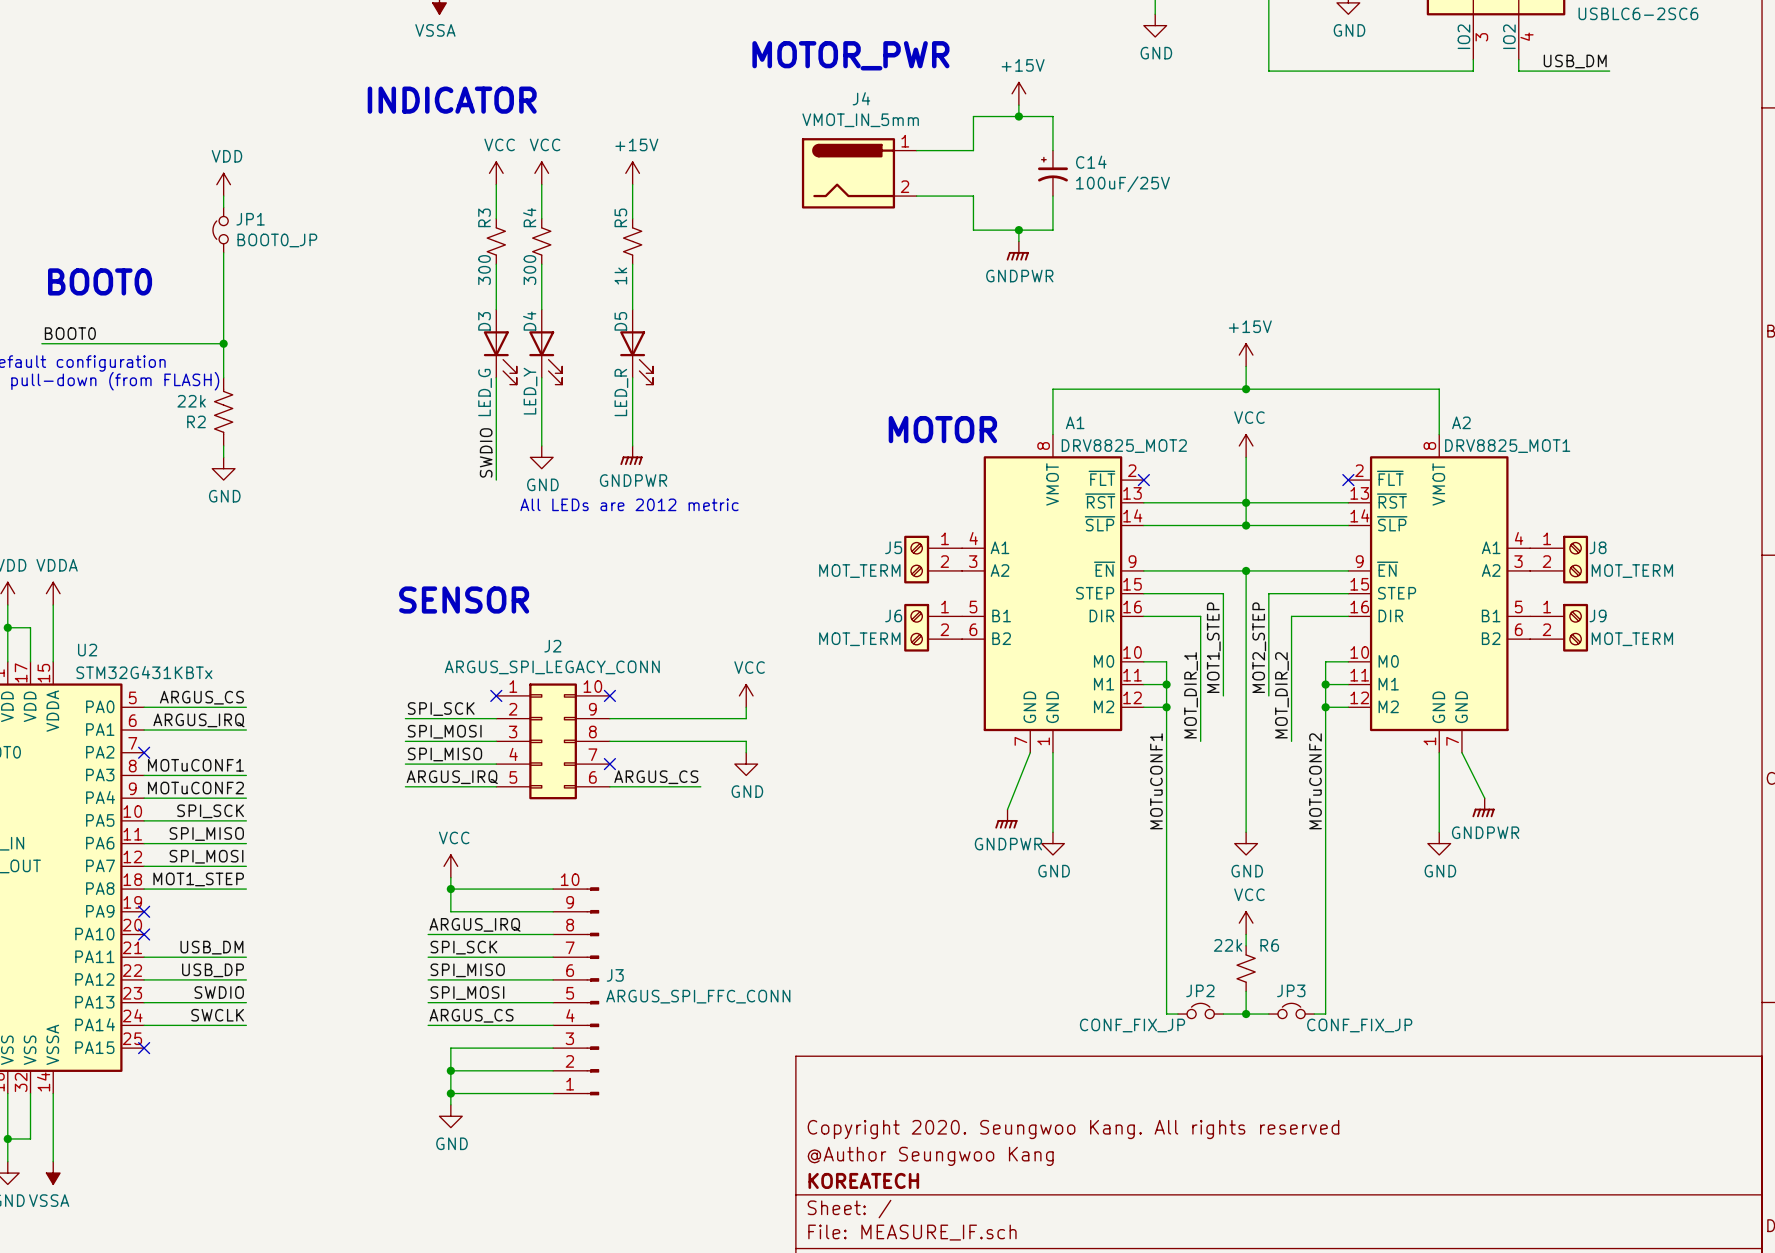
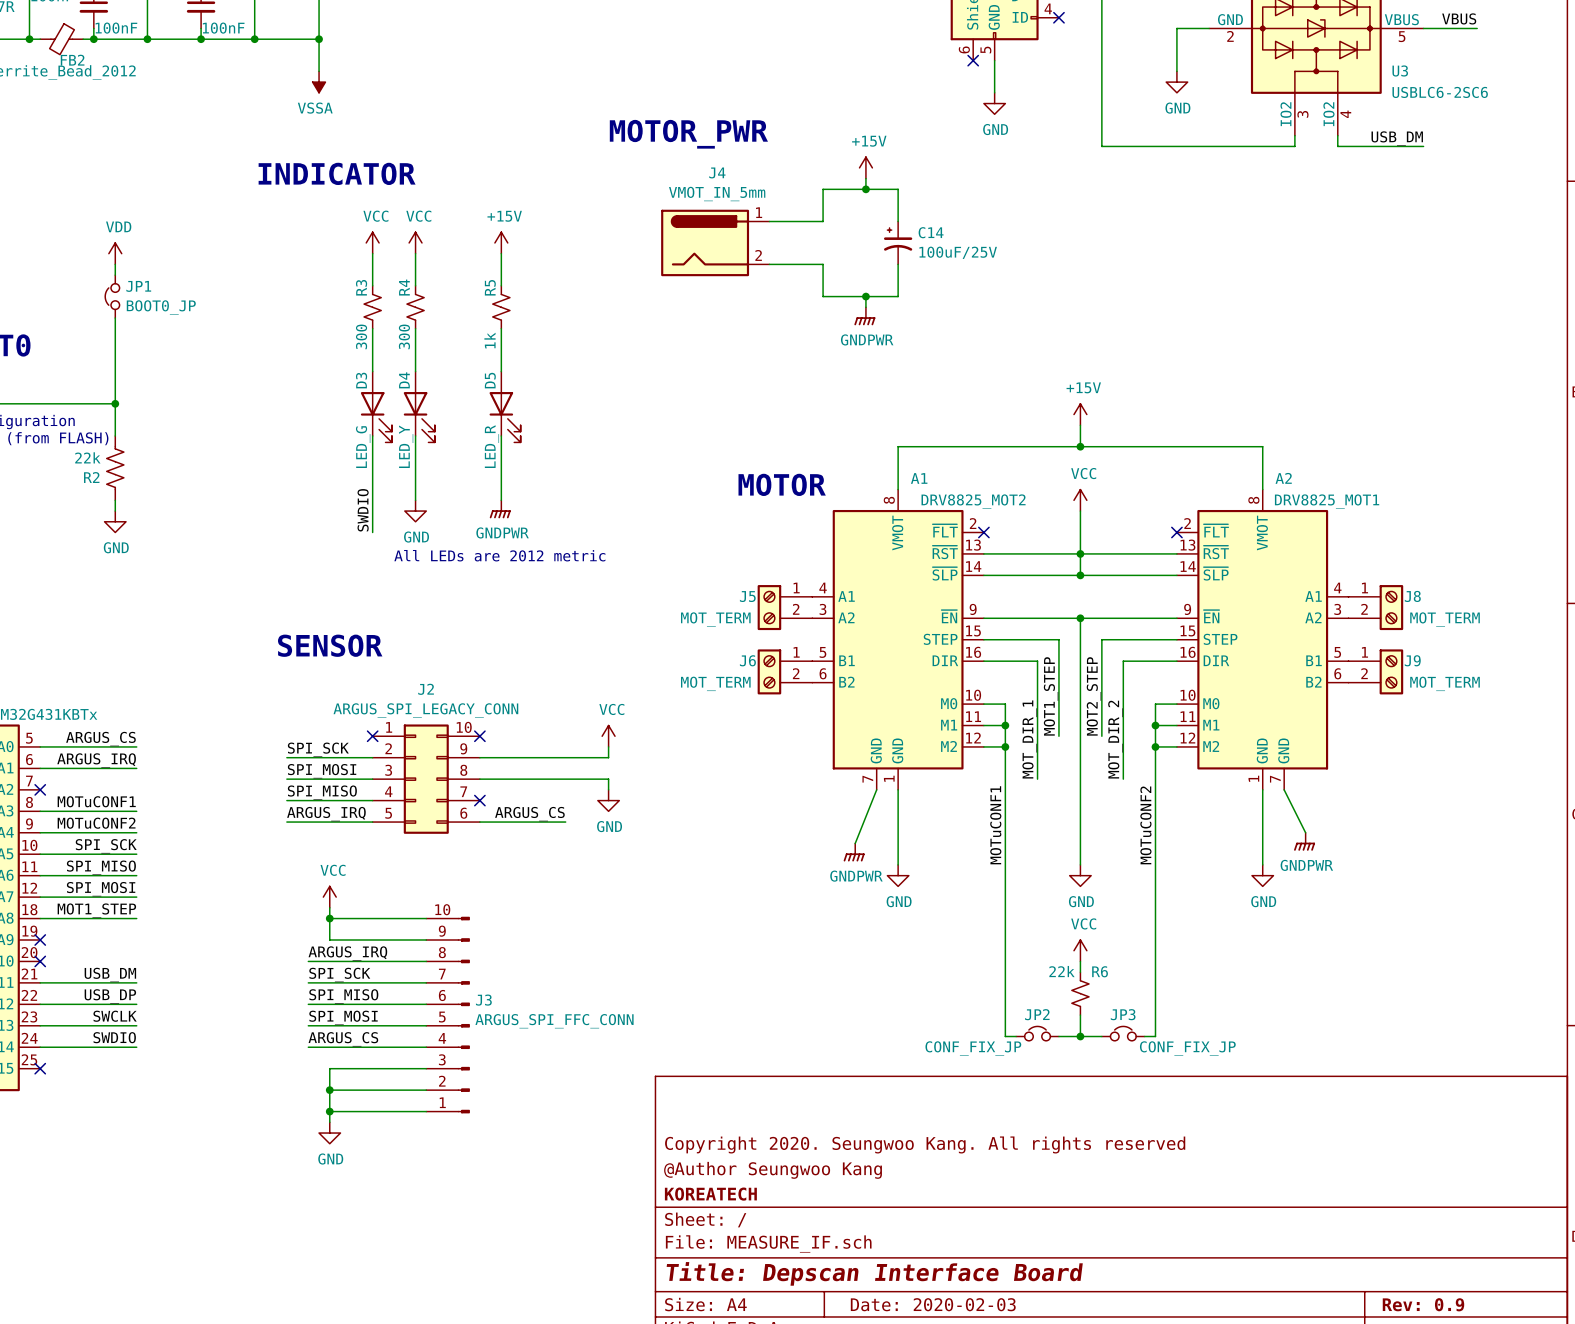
label: SWDIO (219, 992) -> SWCLK (115, 1016)
label: SWCLK (217, 1015) -> SWDIO (114, 1037)

